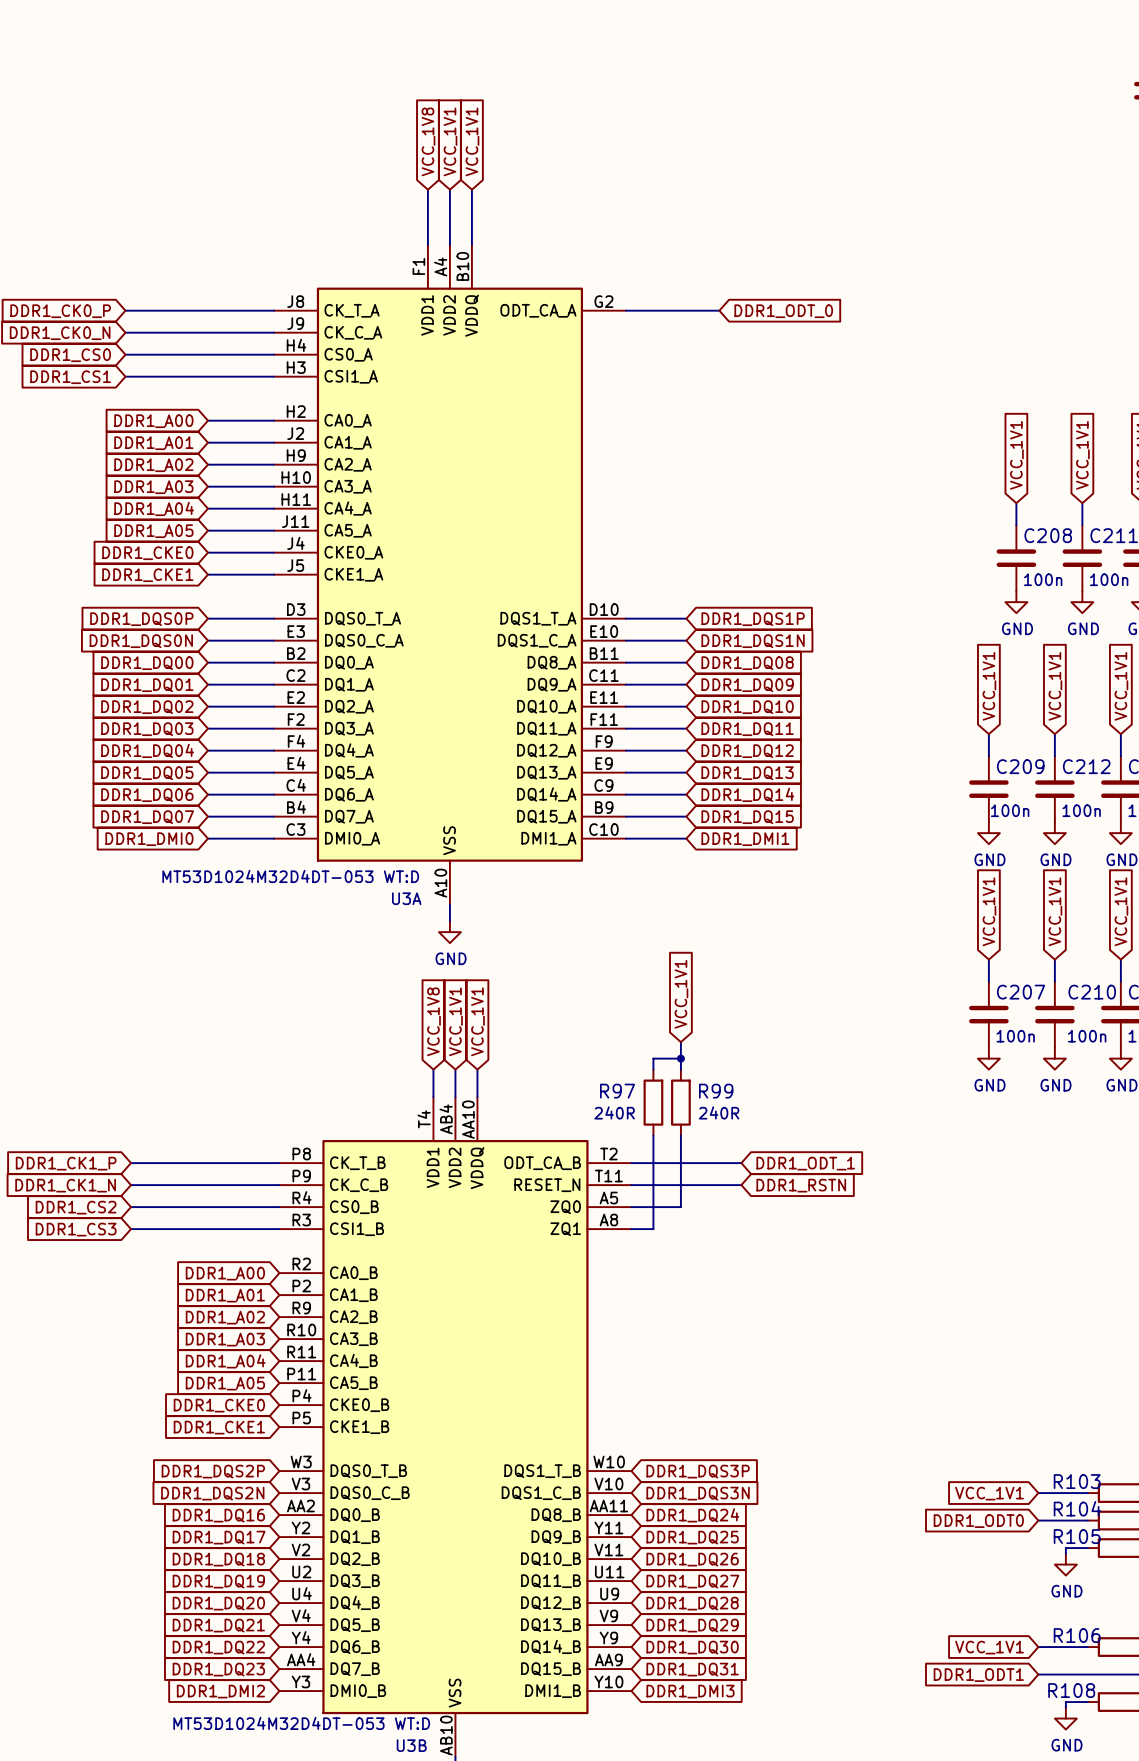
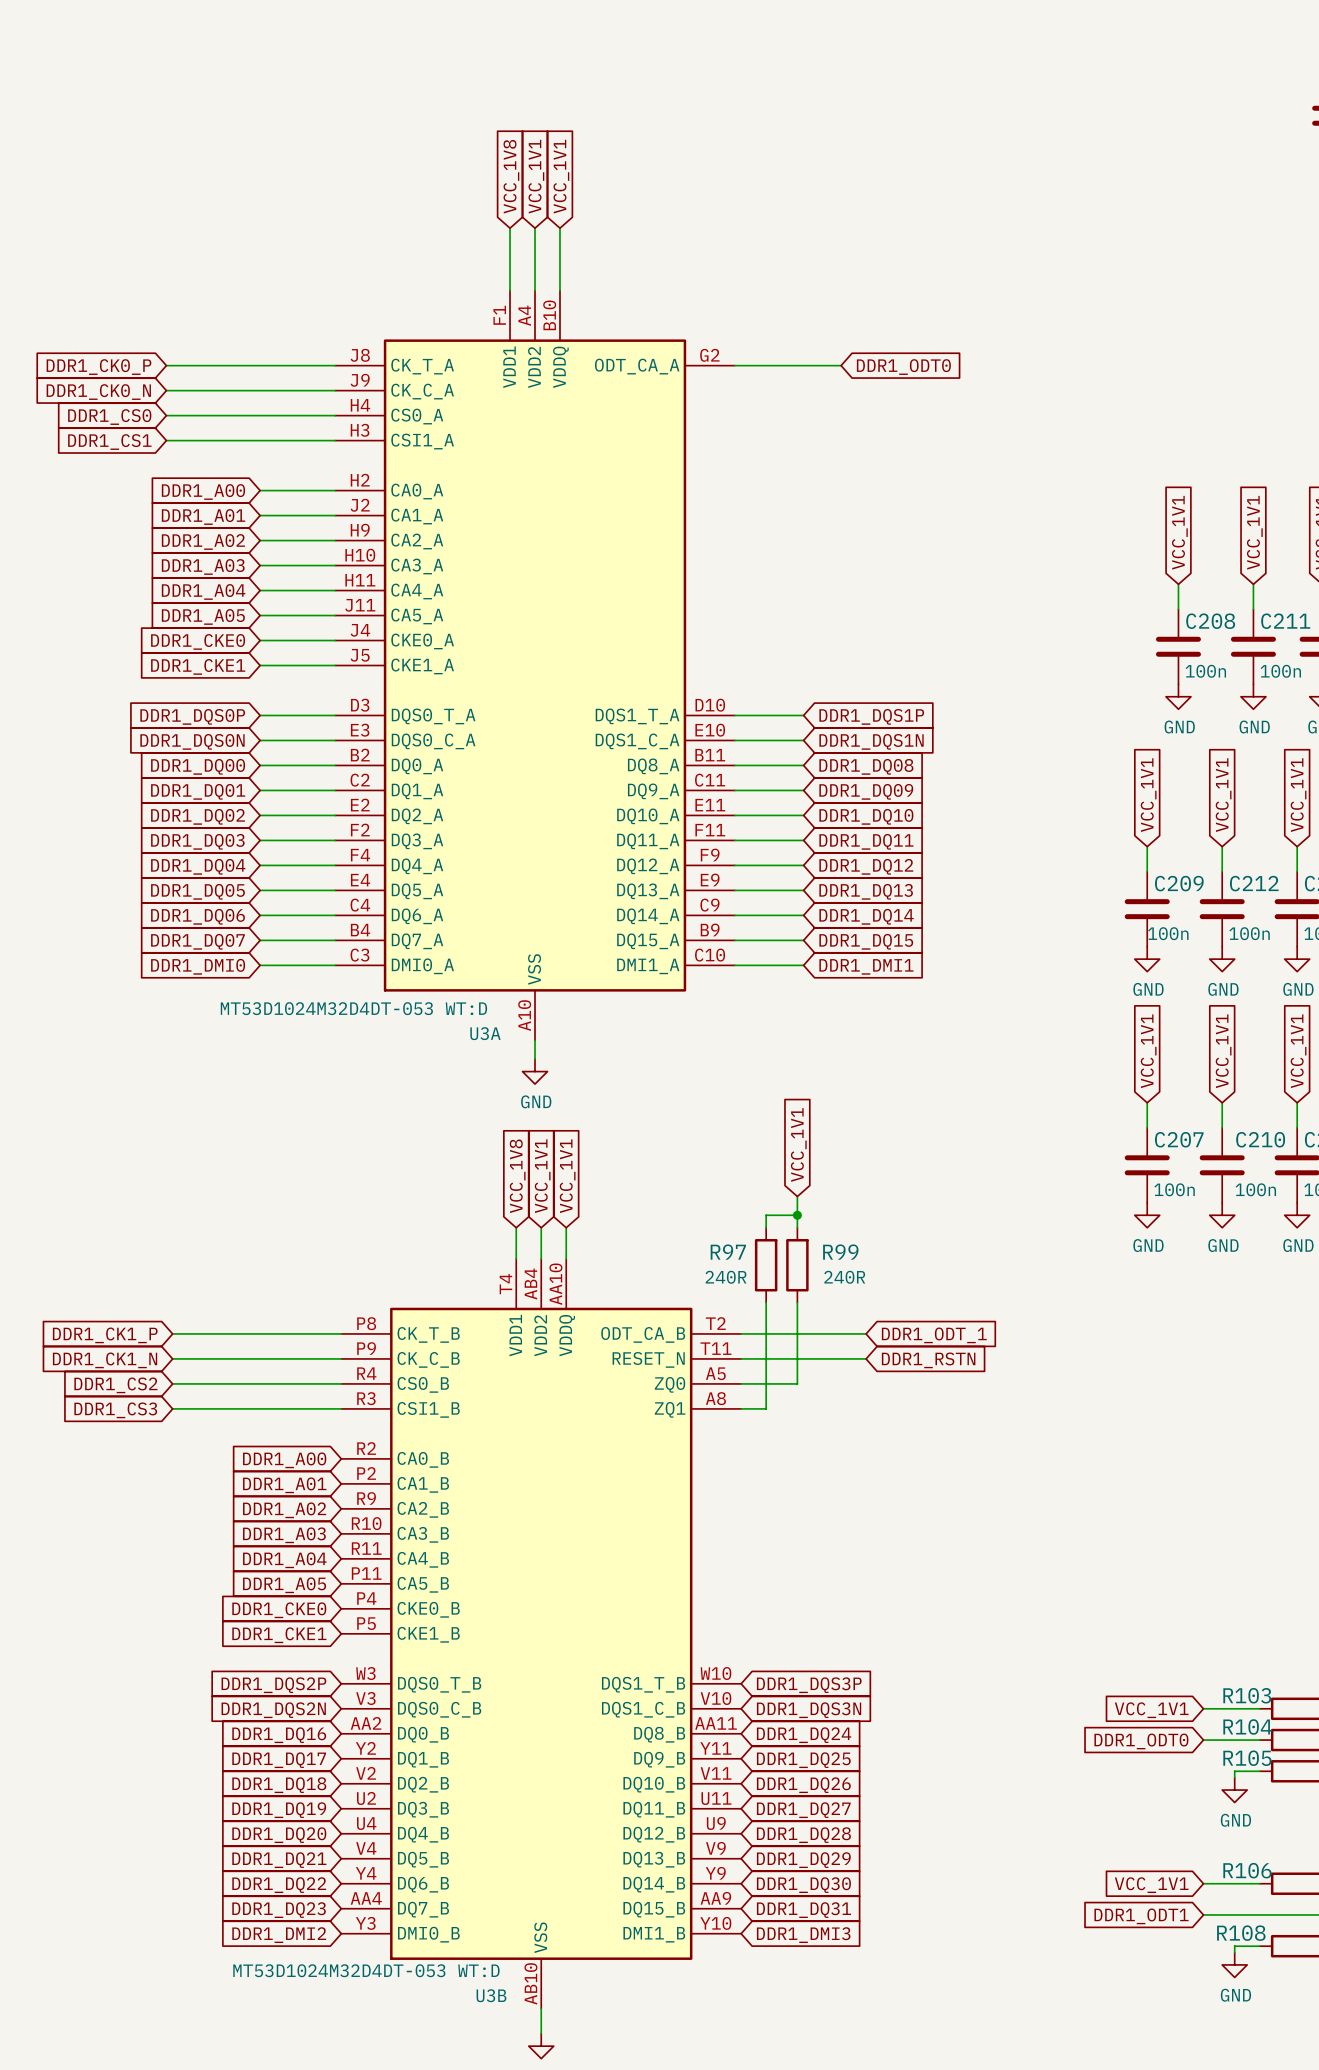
global label: DDR1_ODT_0 (783, 311) -> DDR1_ODT0 (903, 367)

